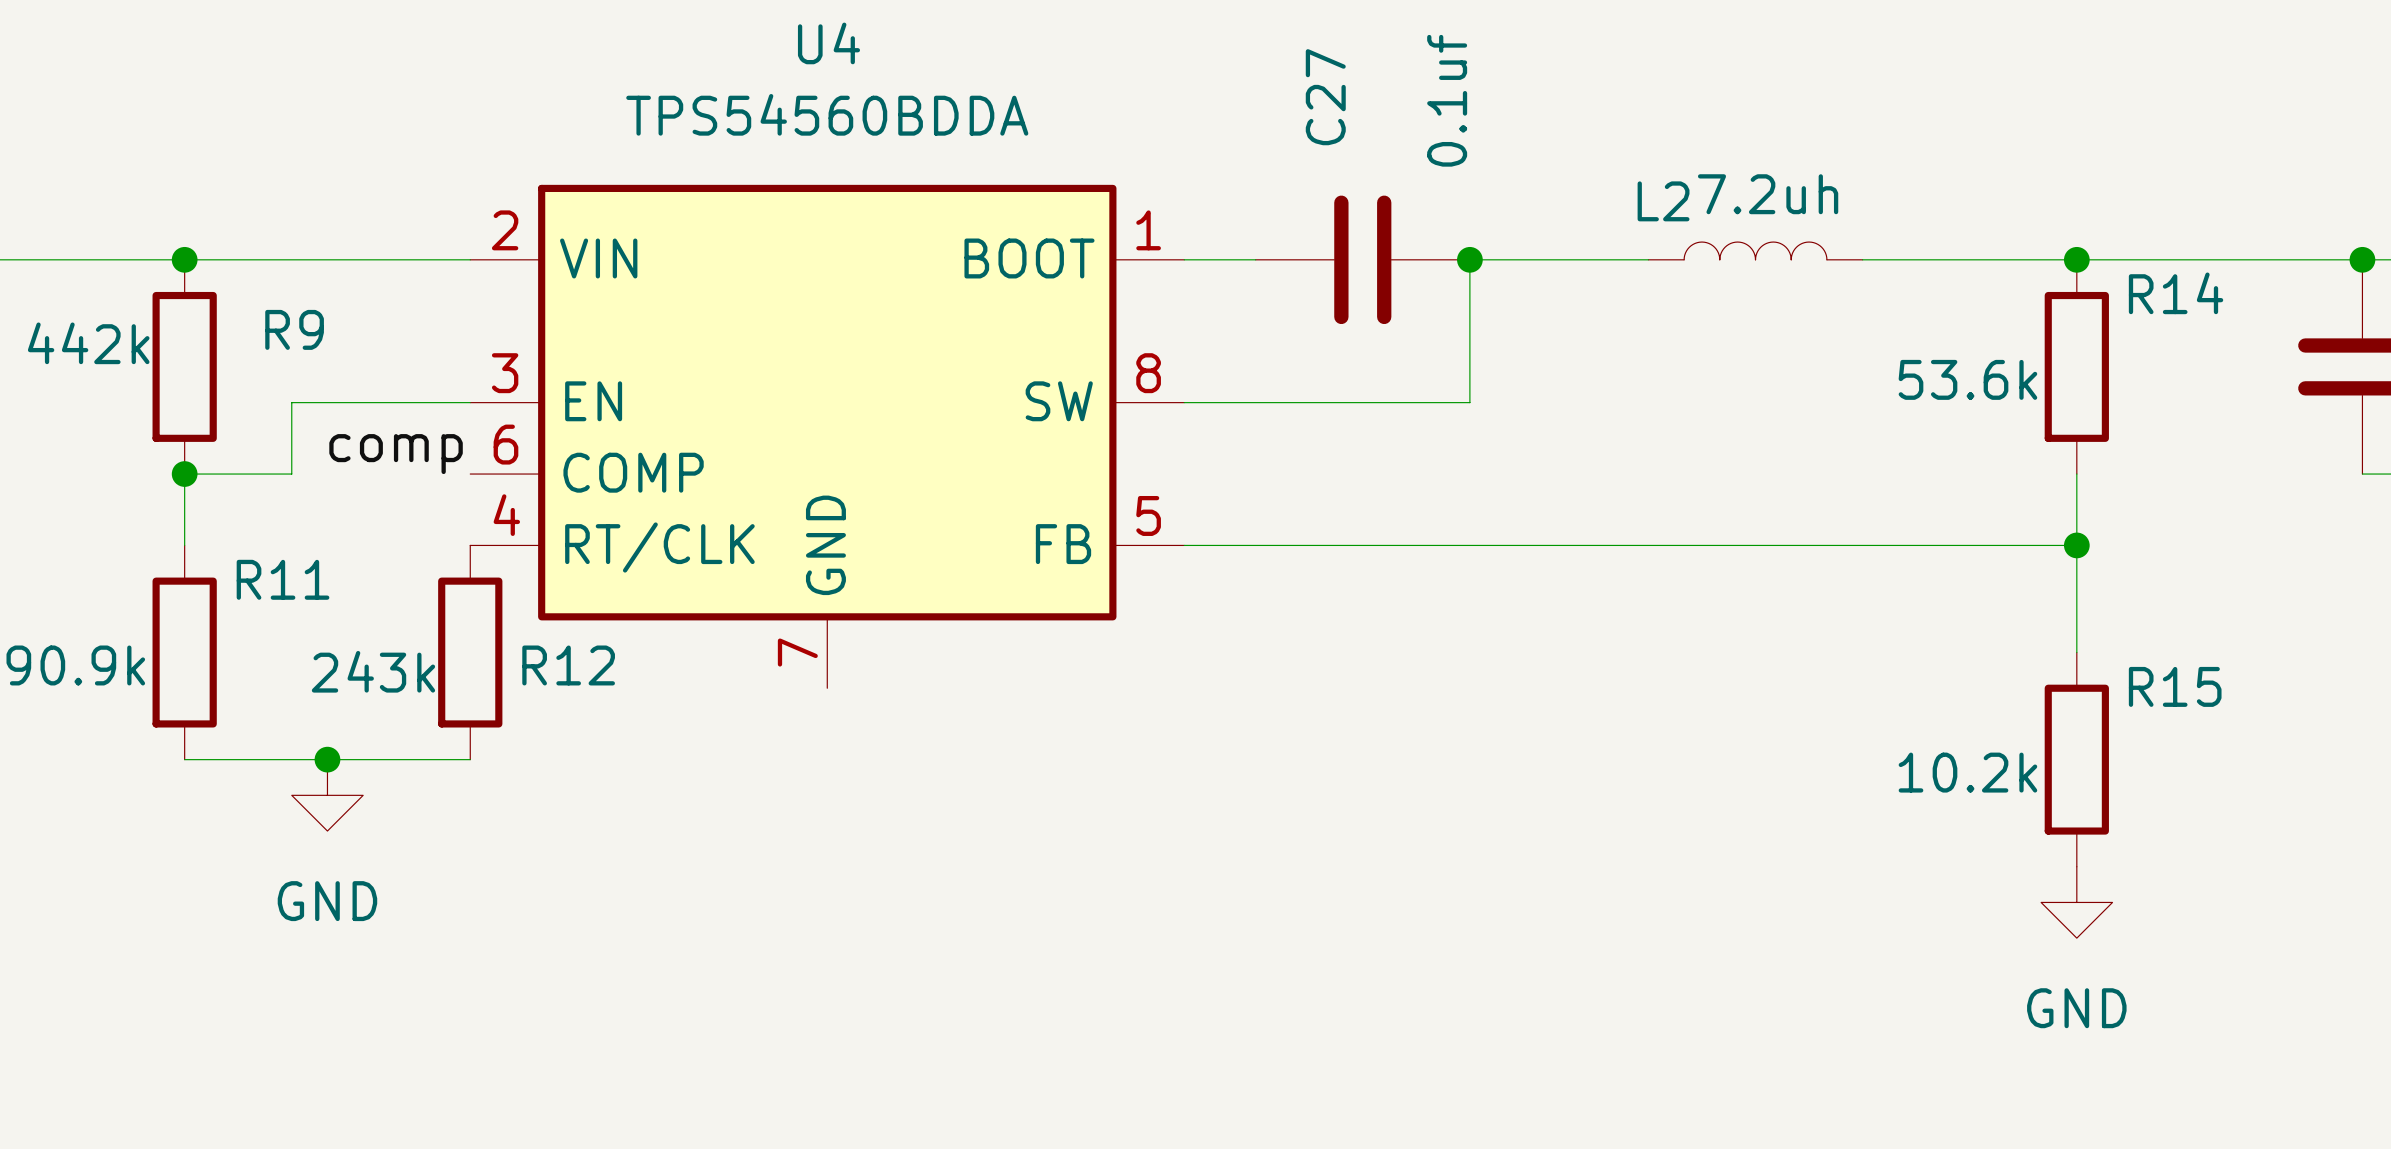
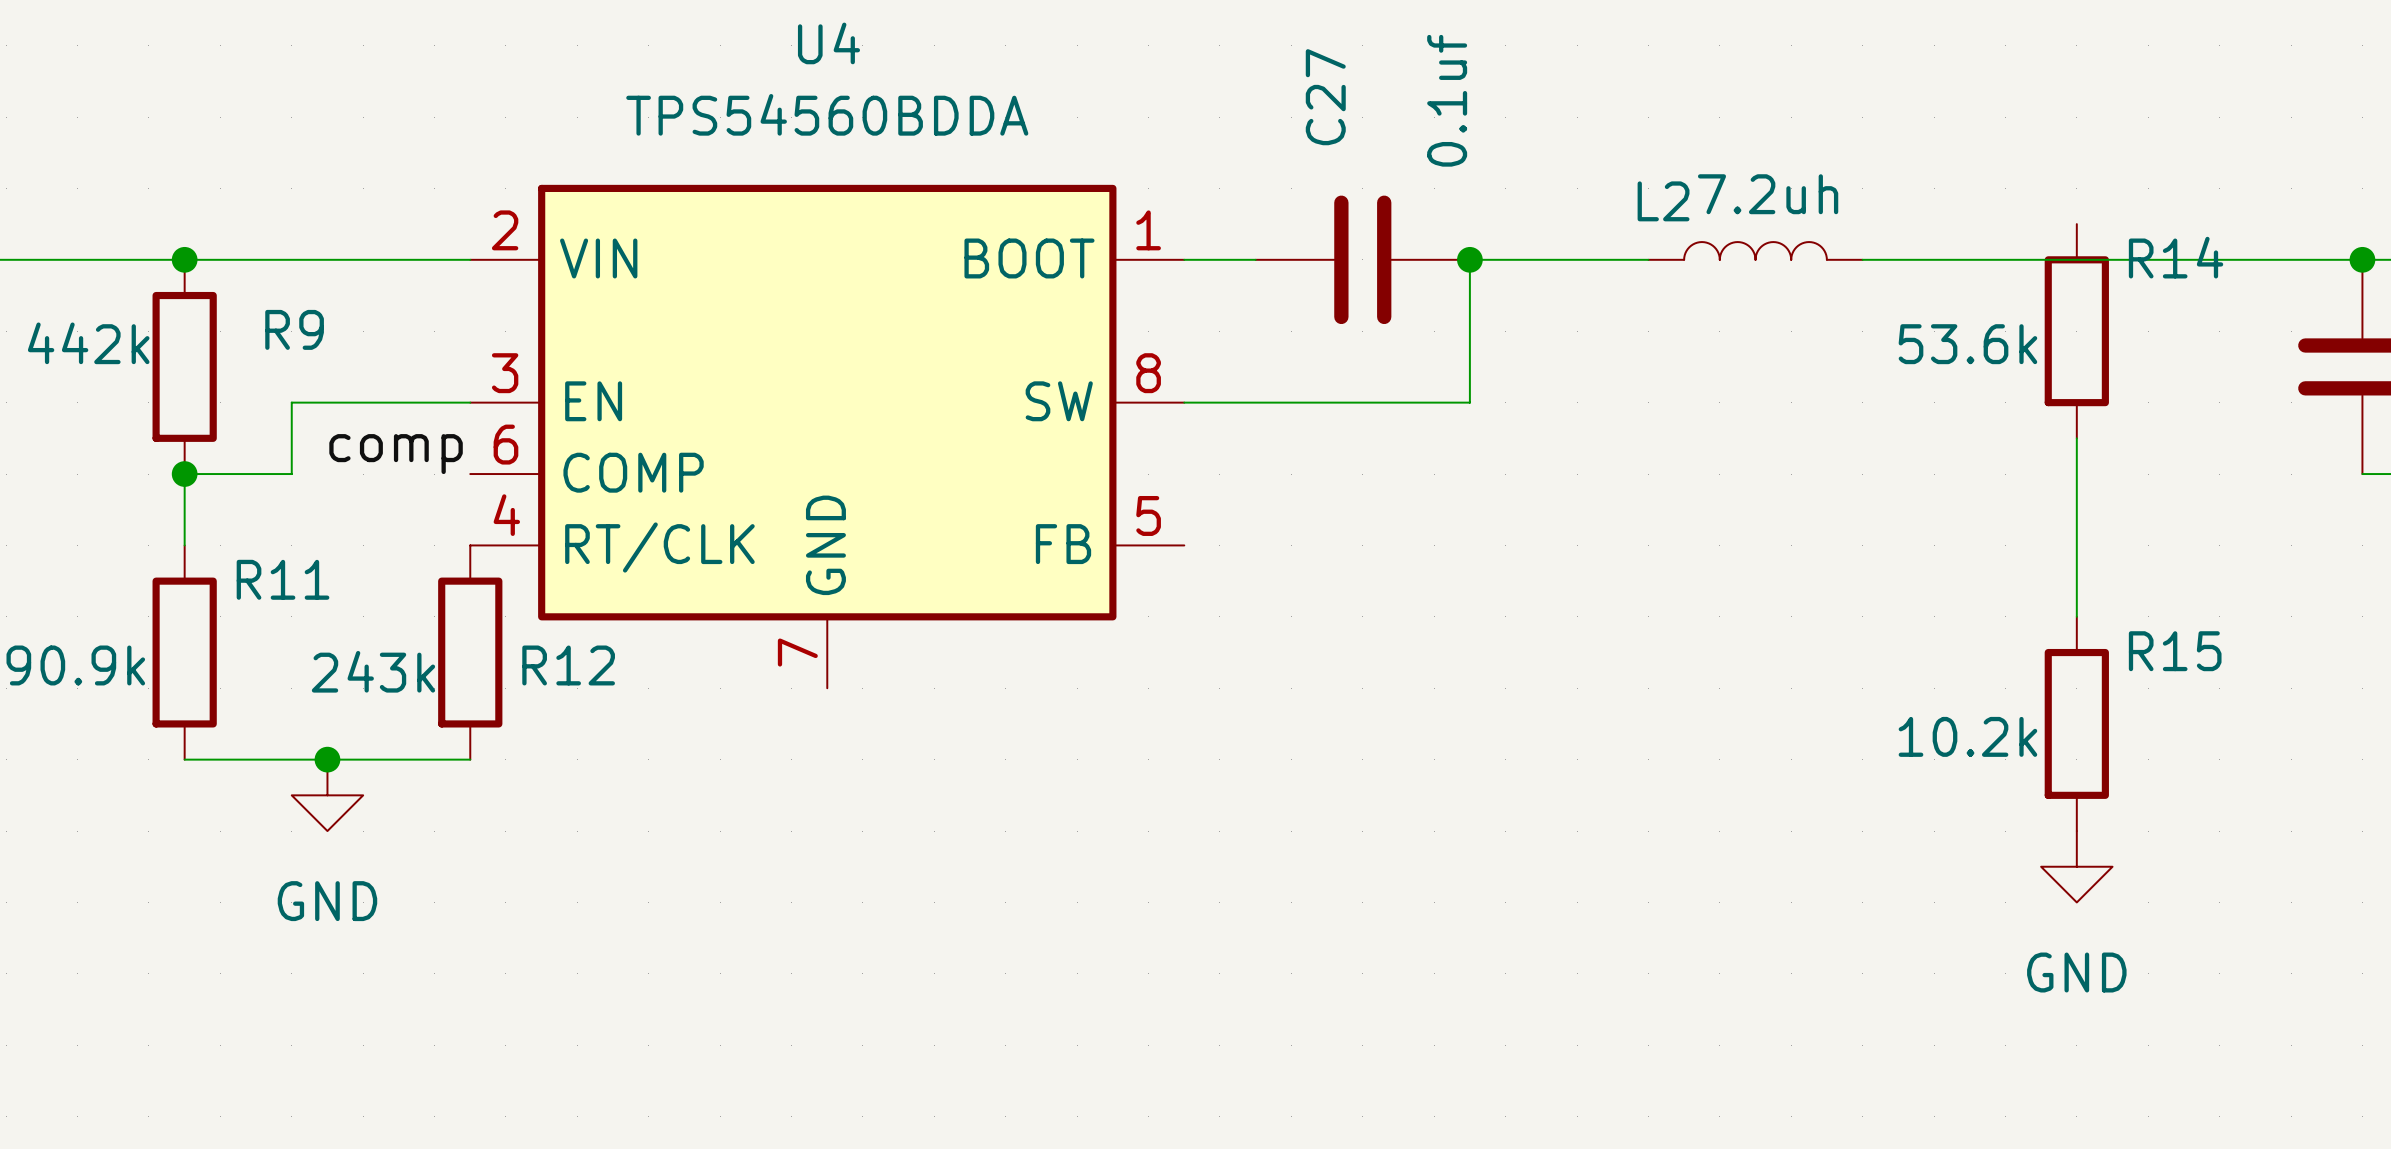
junction: (2076, 259) -> none
R14 position: (2076, 366) -> (2076, 331)
wire: (1184, 545) (2076, 545) -> none
junction: (2076, 545) -> none
R15 position: (2076, 759) -> (2076, 723)
power symbol position: GND (2076, 902) -> GND (2076, 866)

